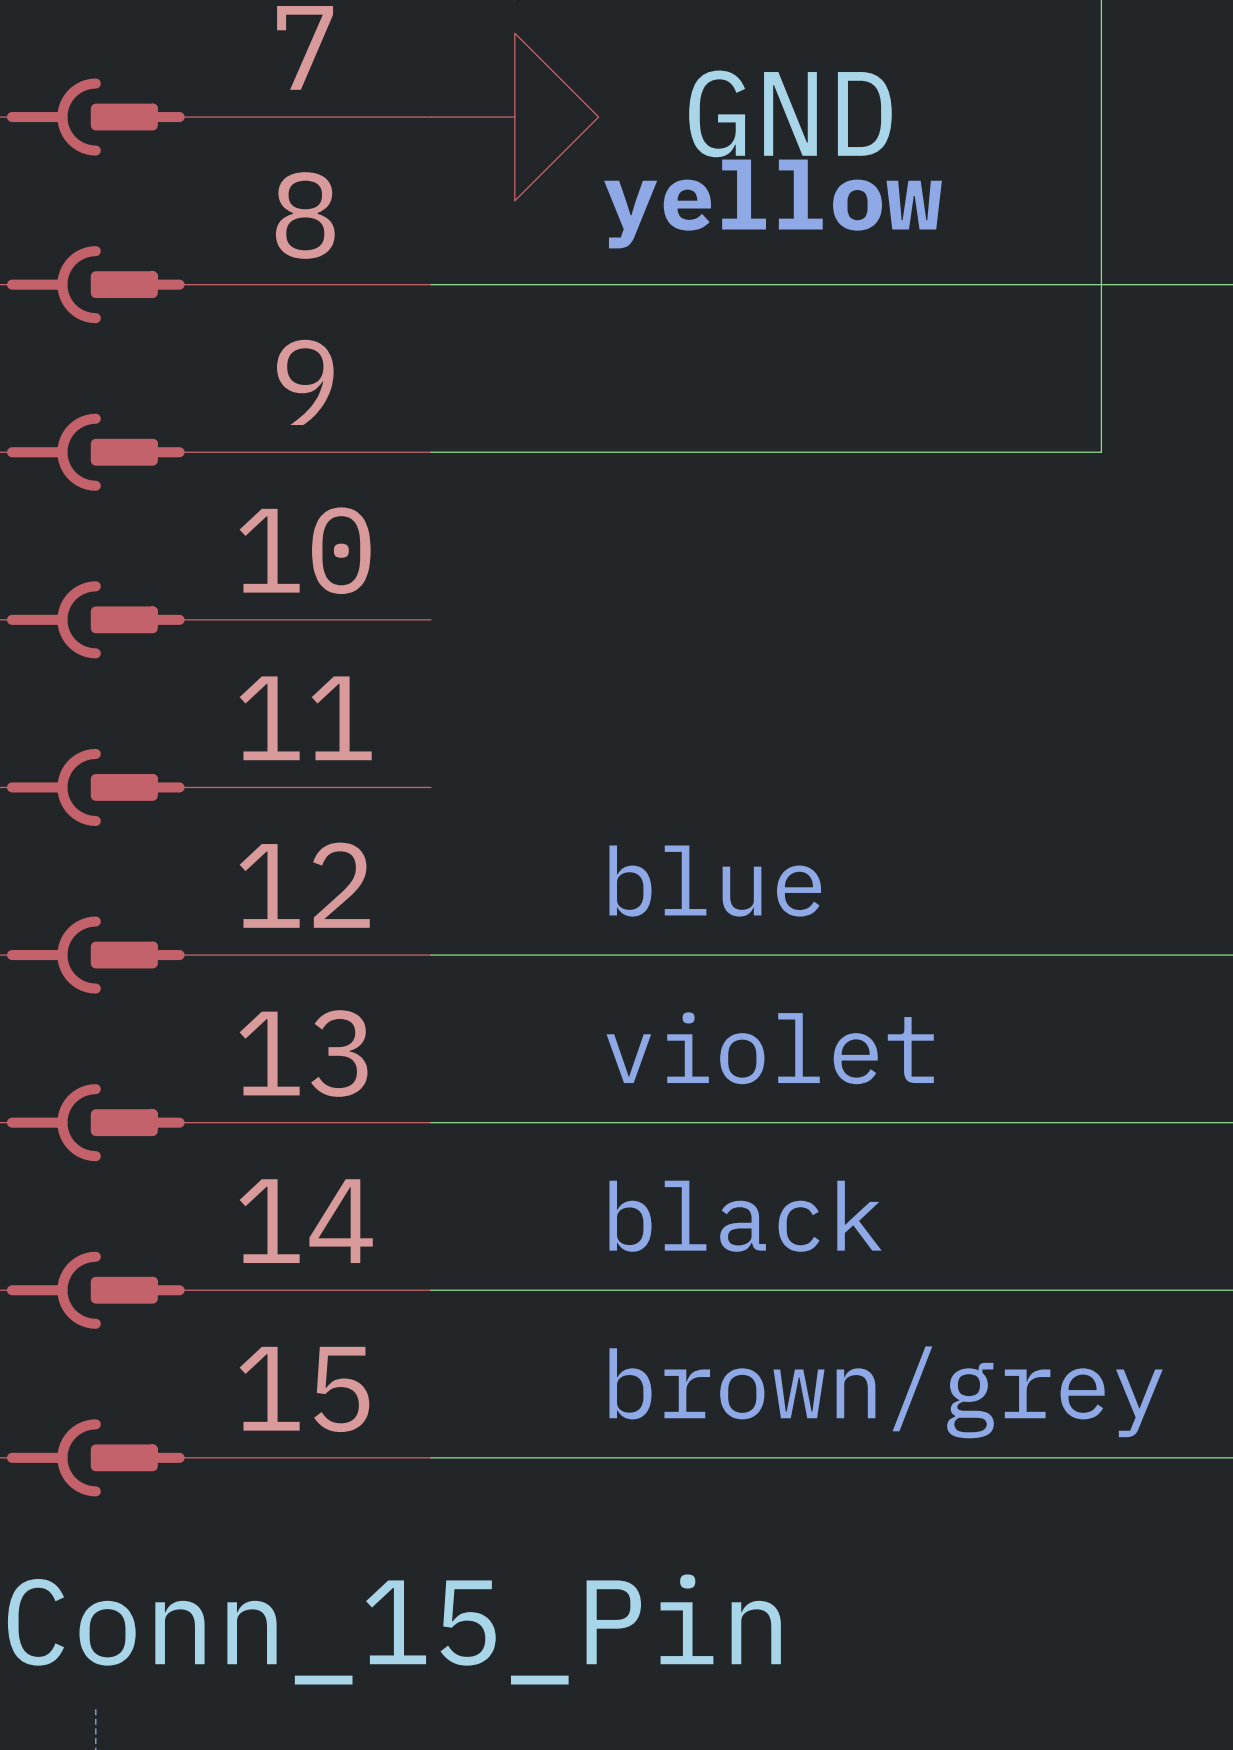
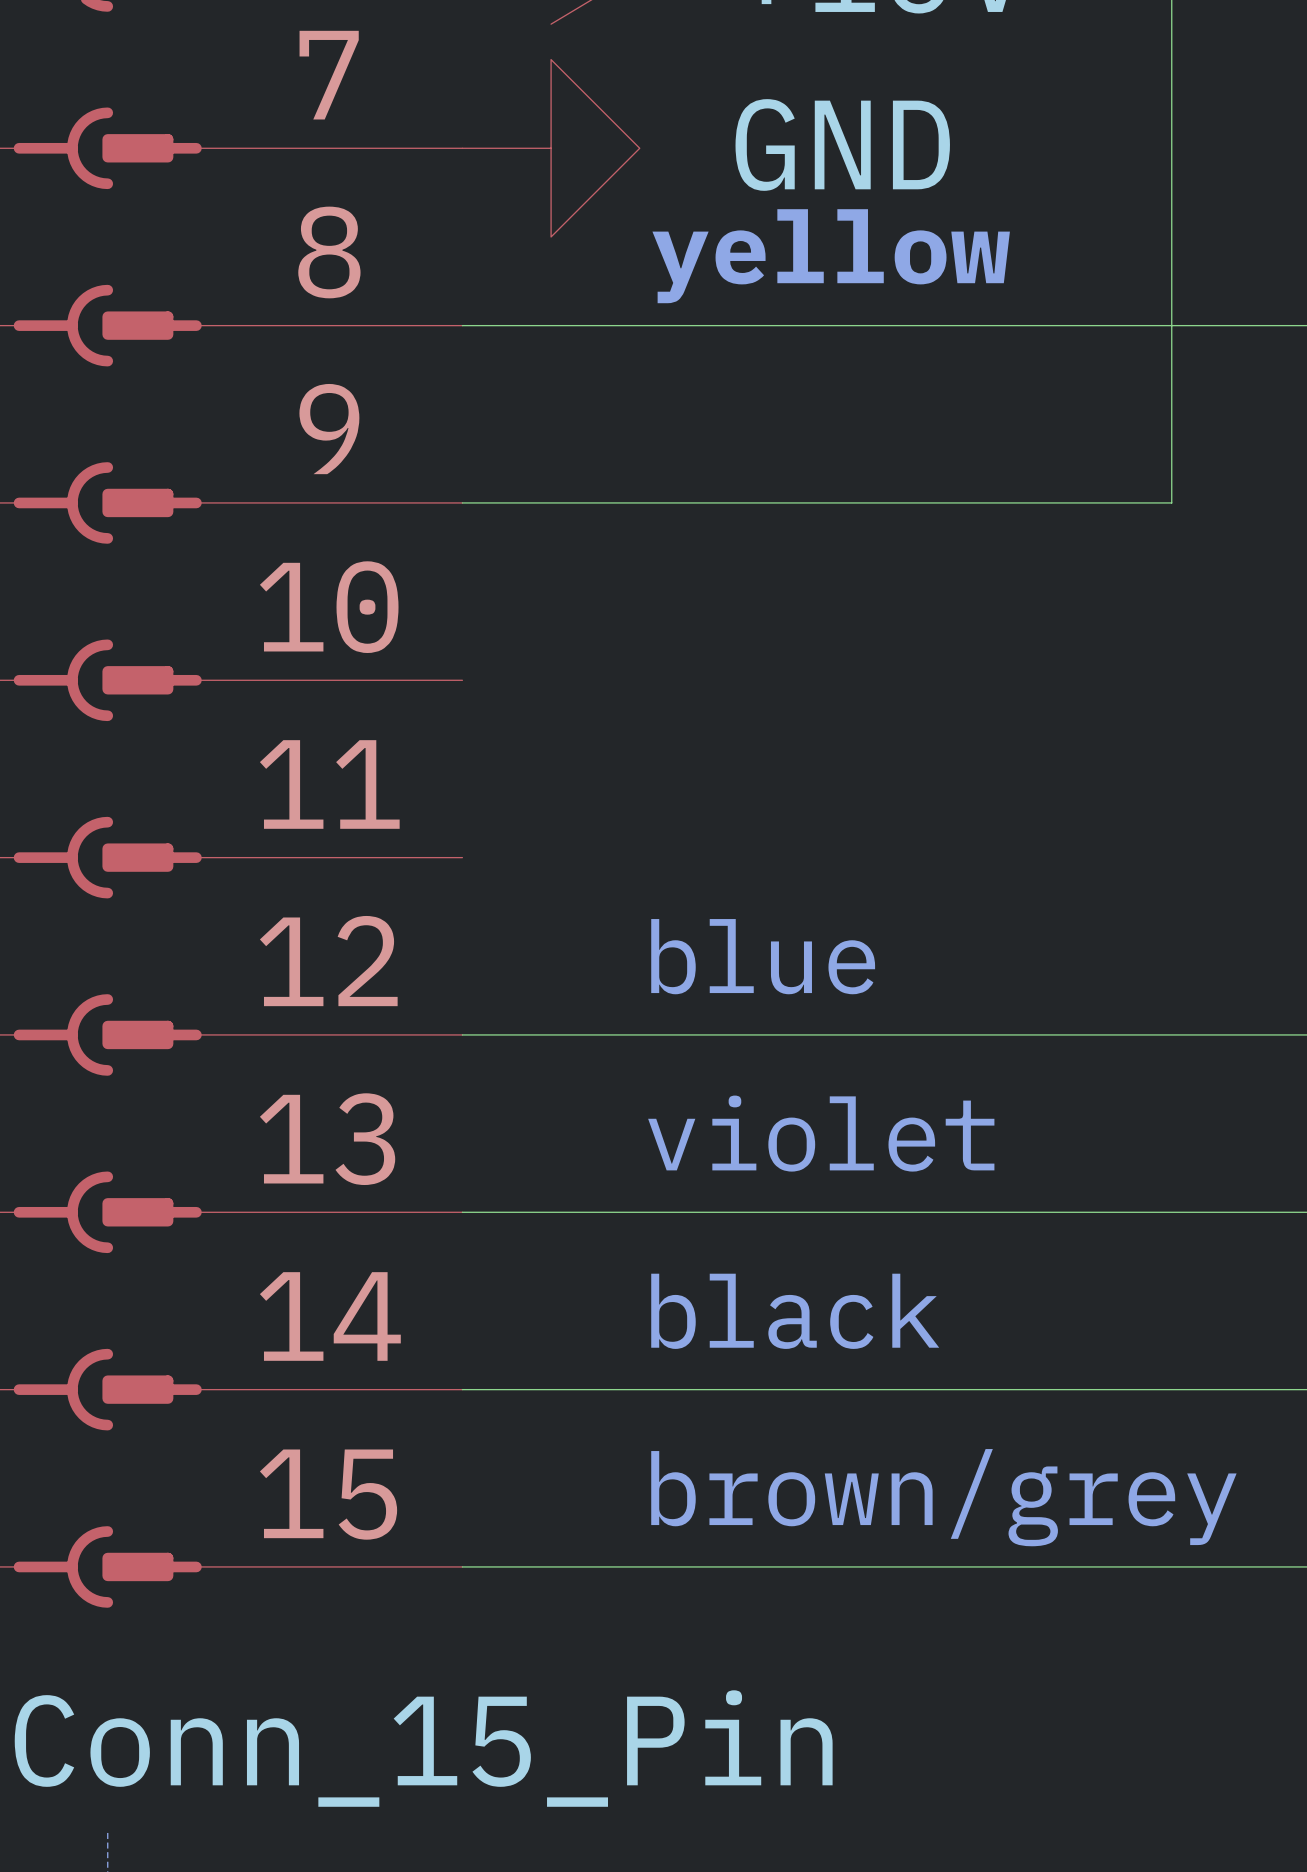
text position: yellow (773, 203) -> yellow (831, 256)

